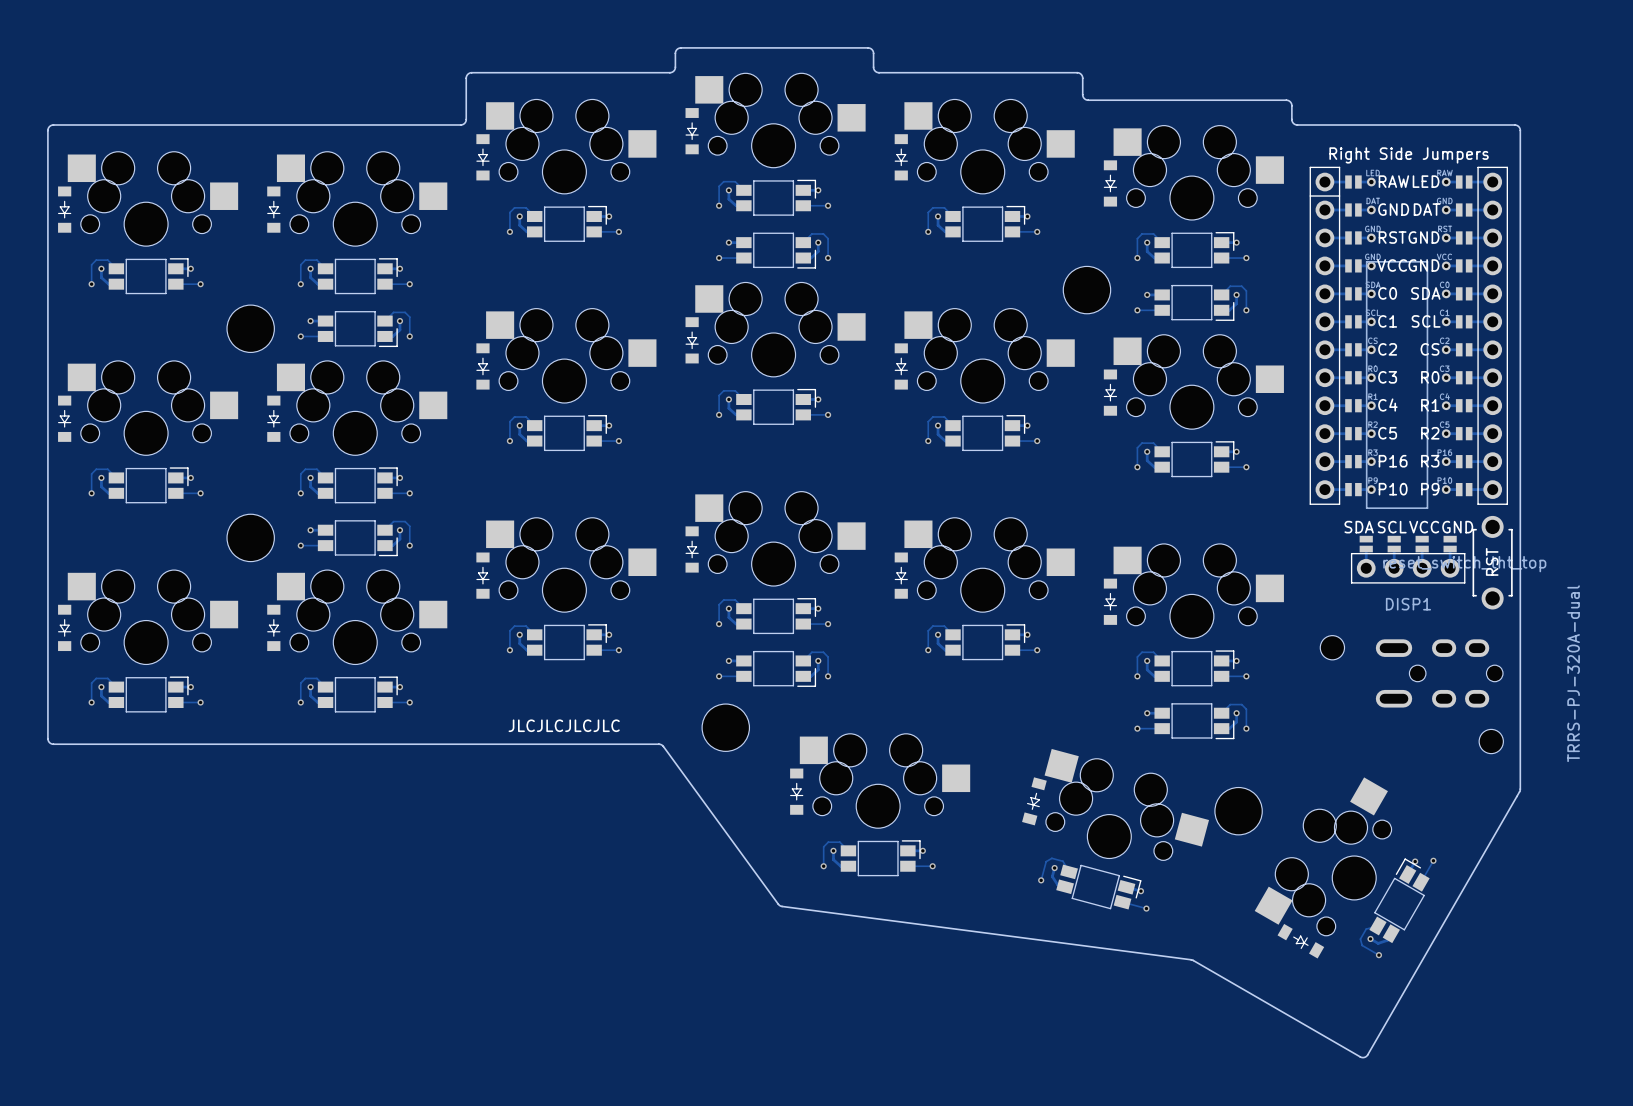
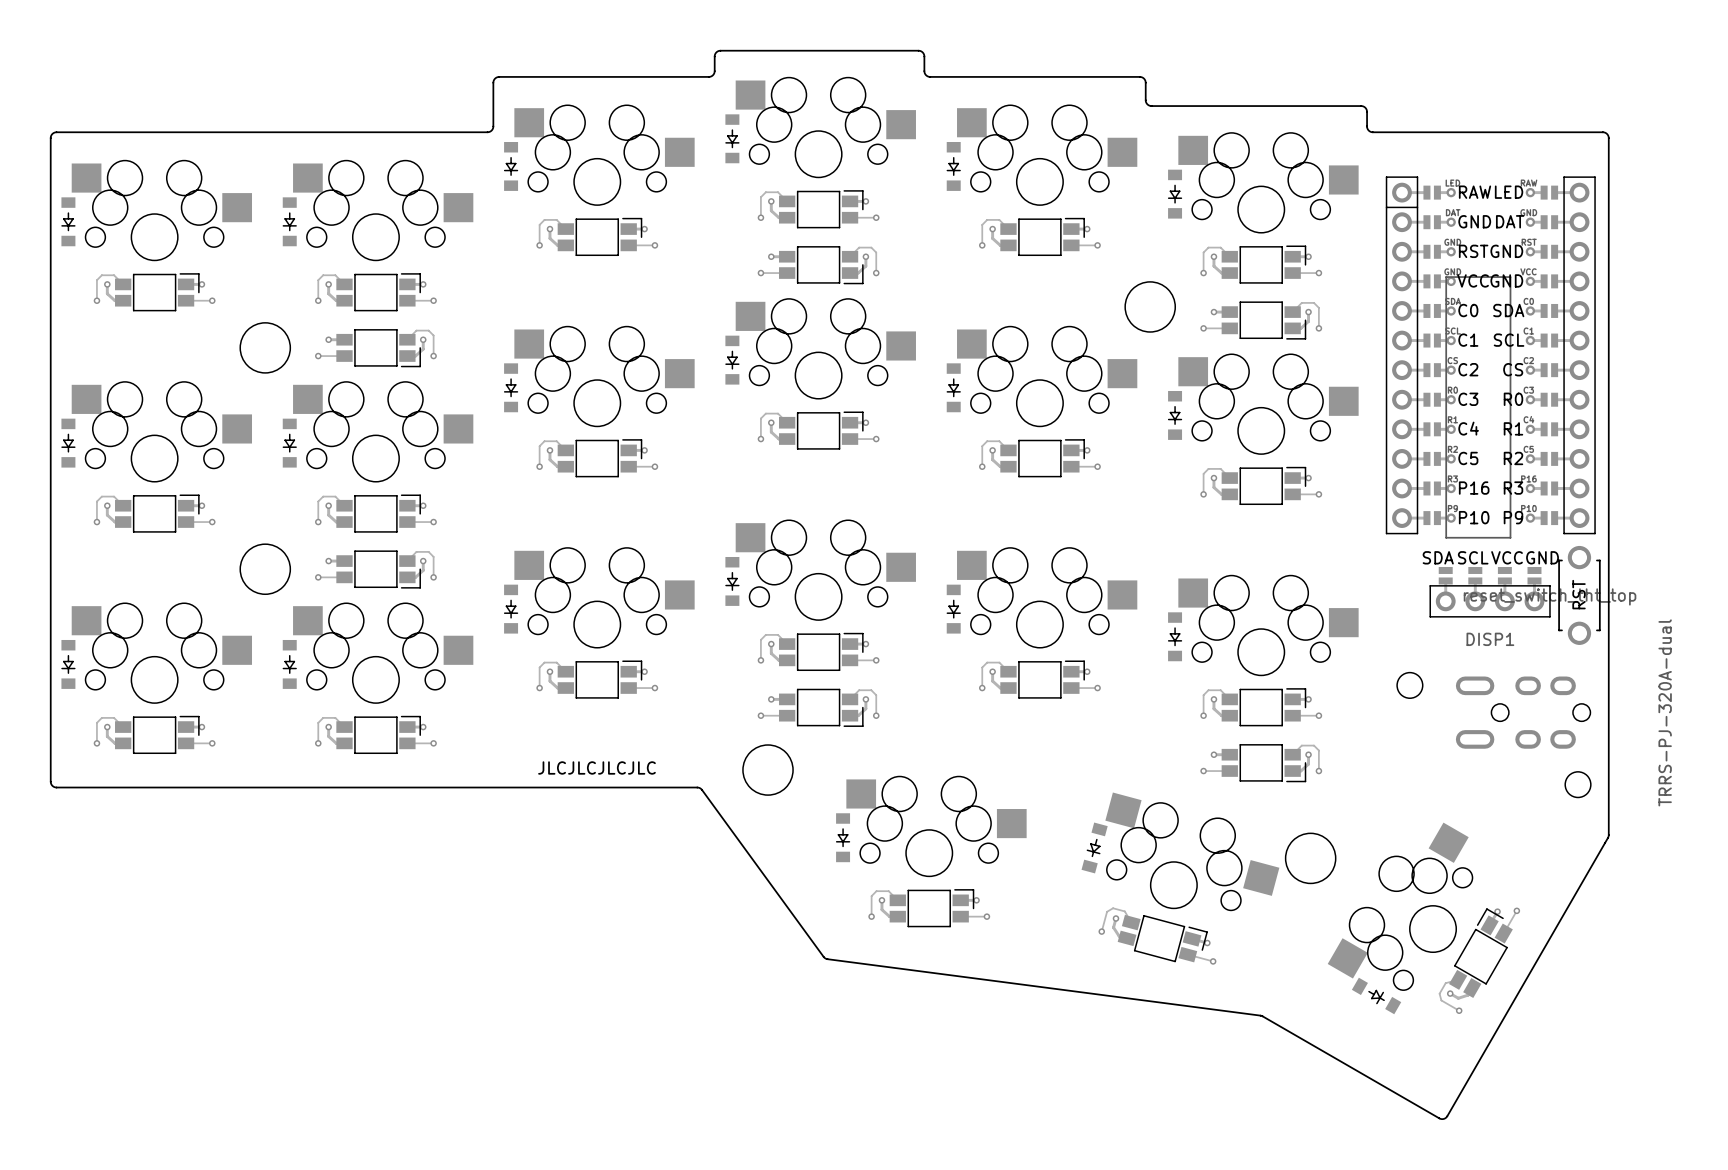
part text: Right Side Jumpers (1409, 155) -> none

